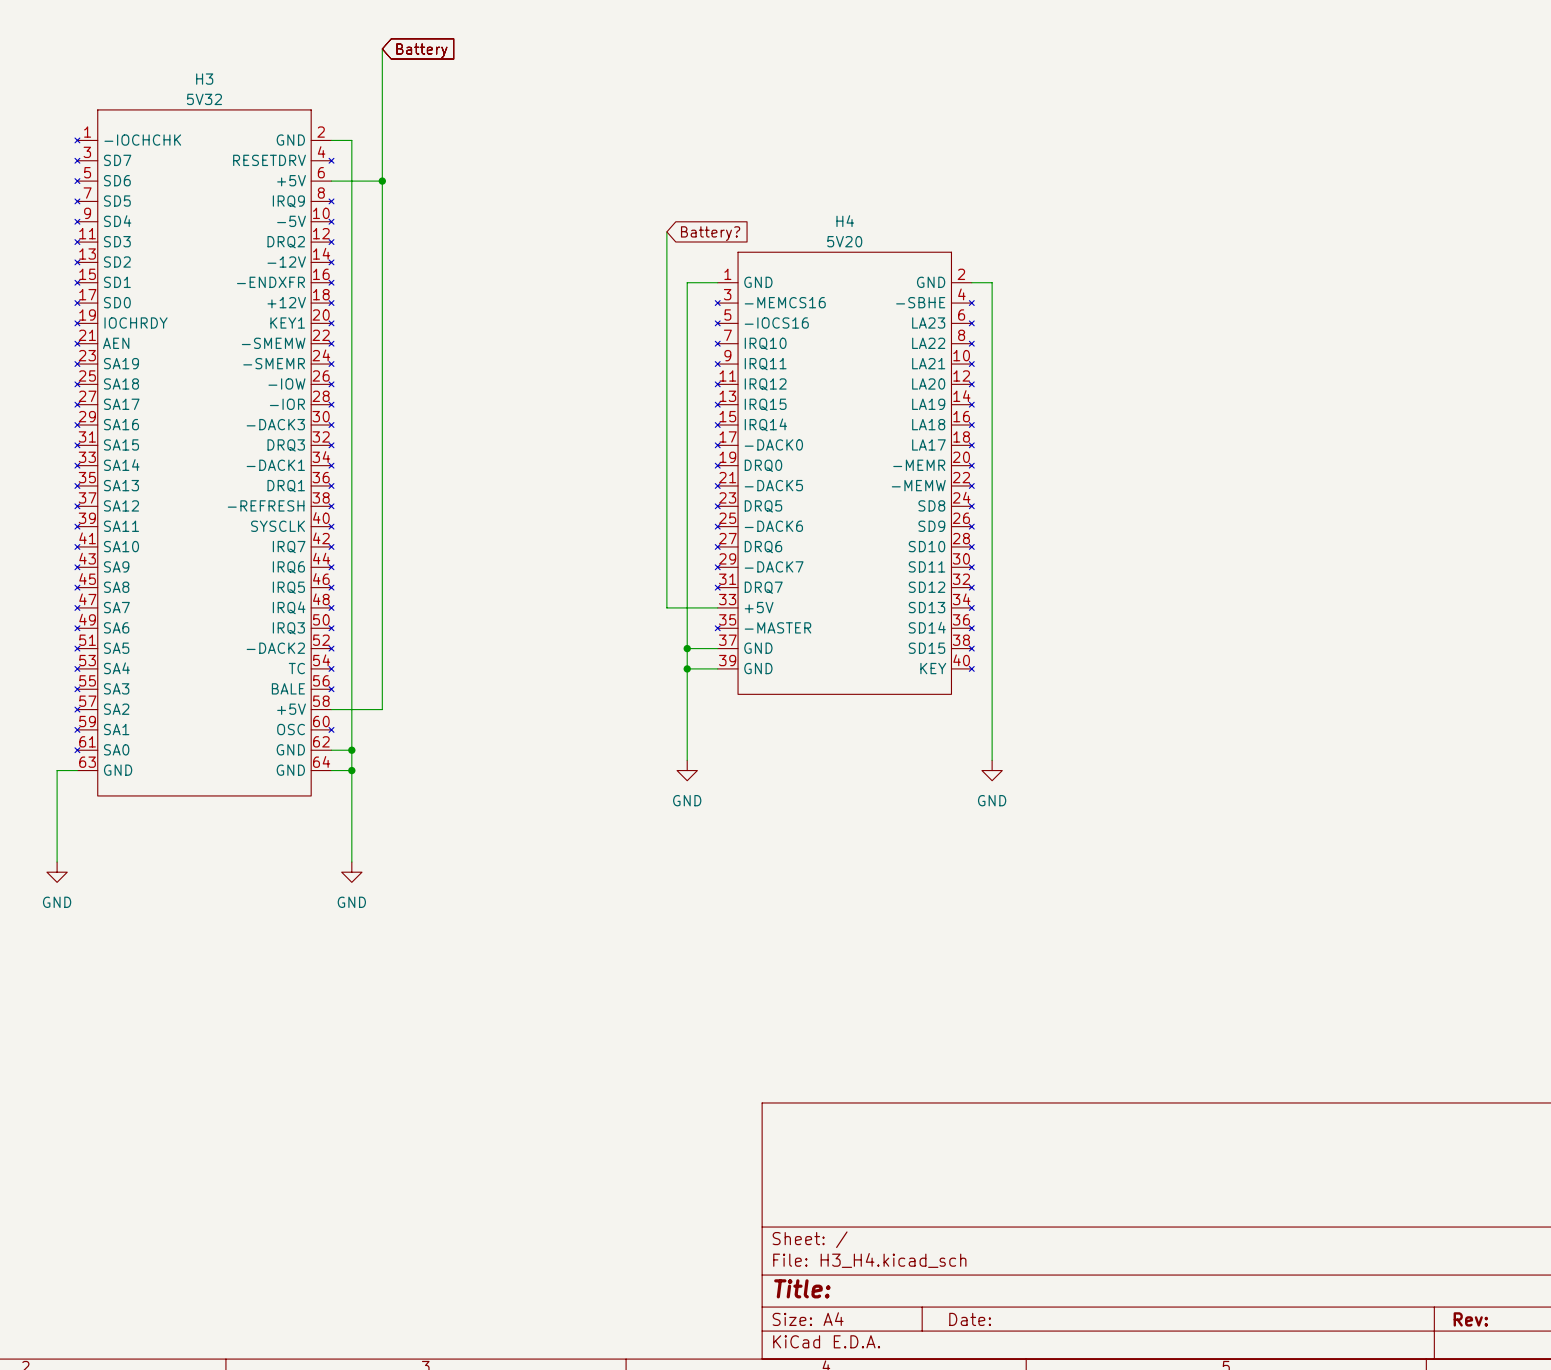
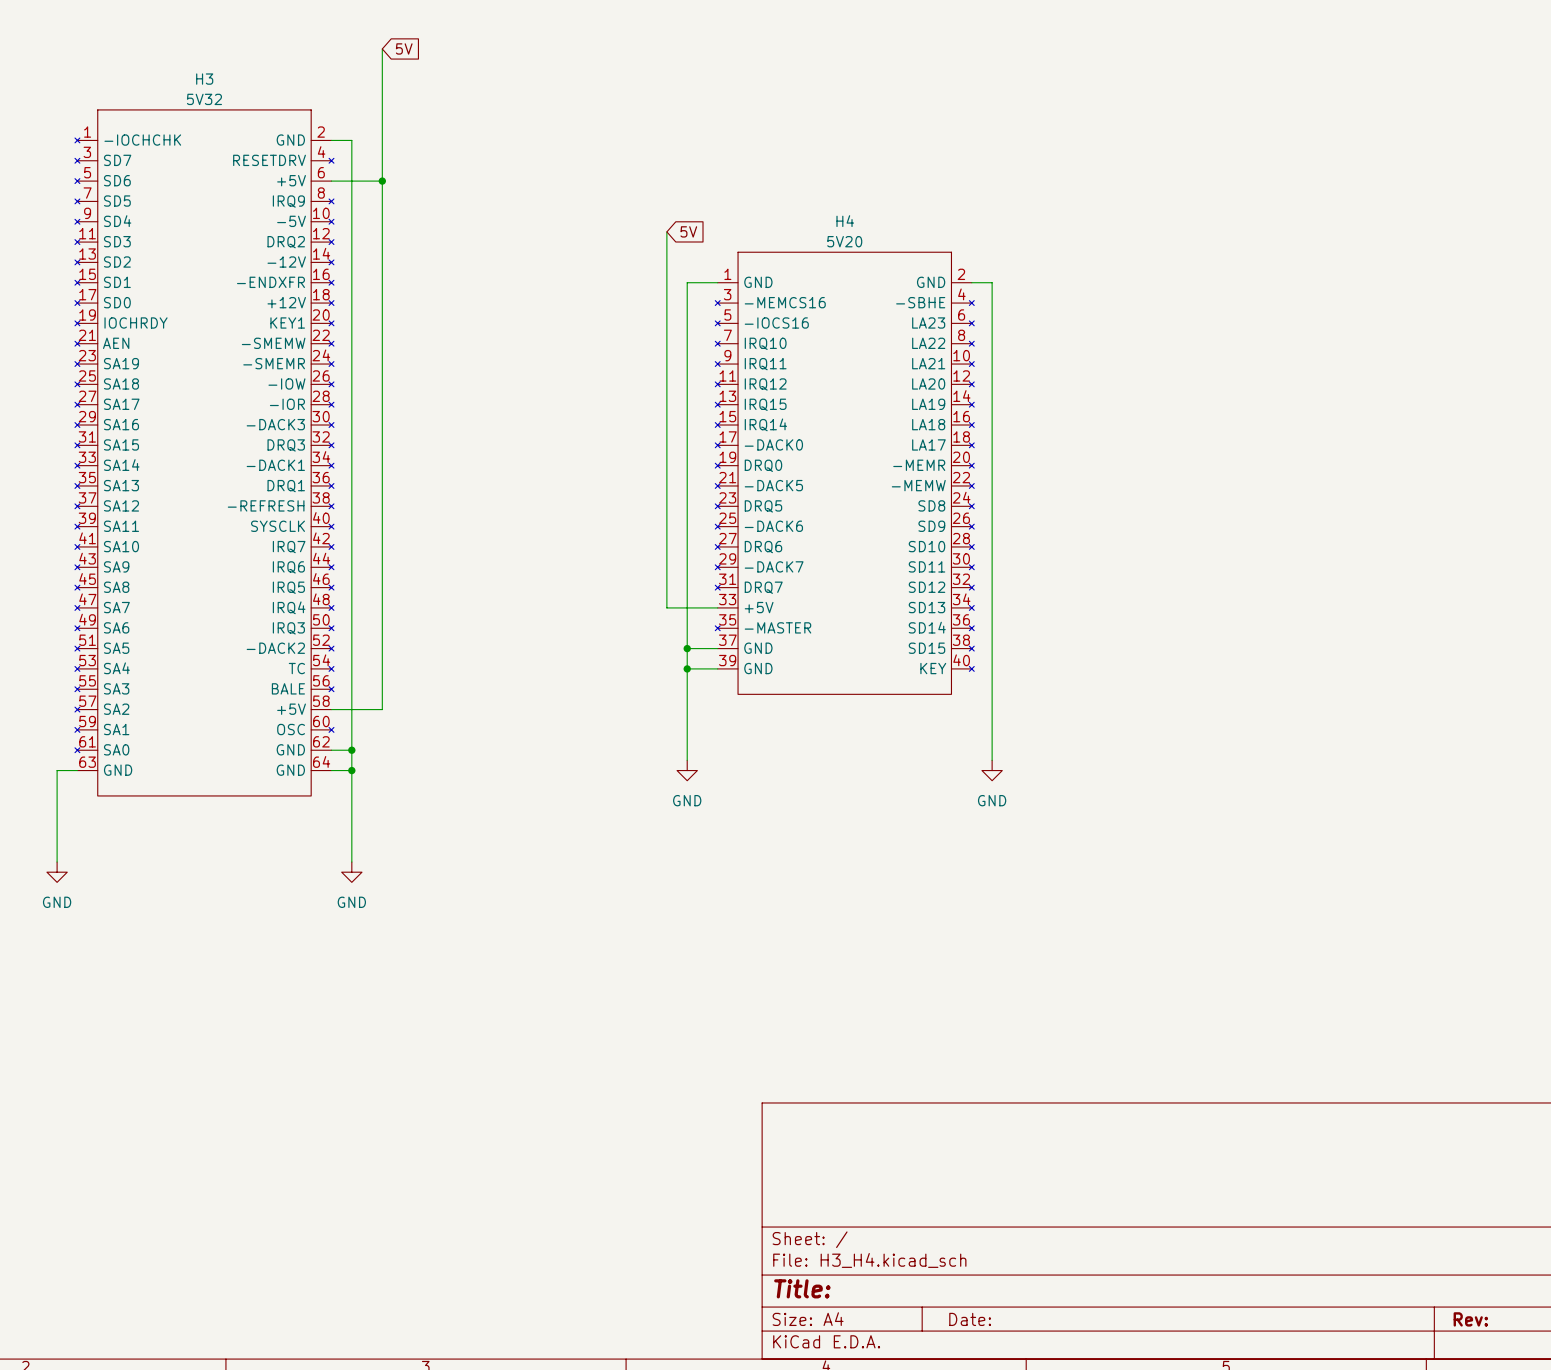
global label: Battery (421, 50) -> 5V (404, 48)
global label: Battery? (710, 233) -> 5V (688, 231)

